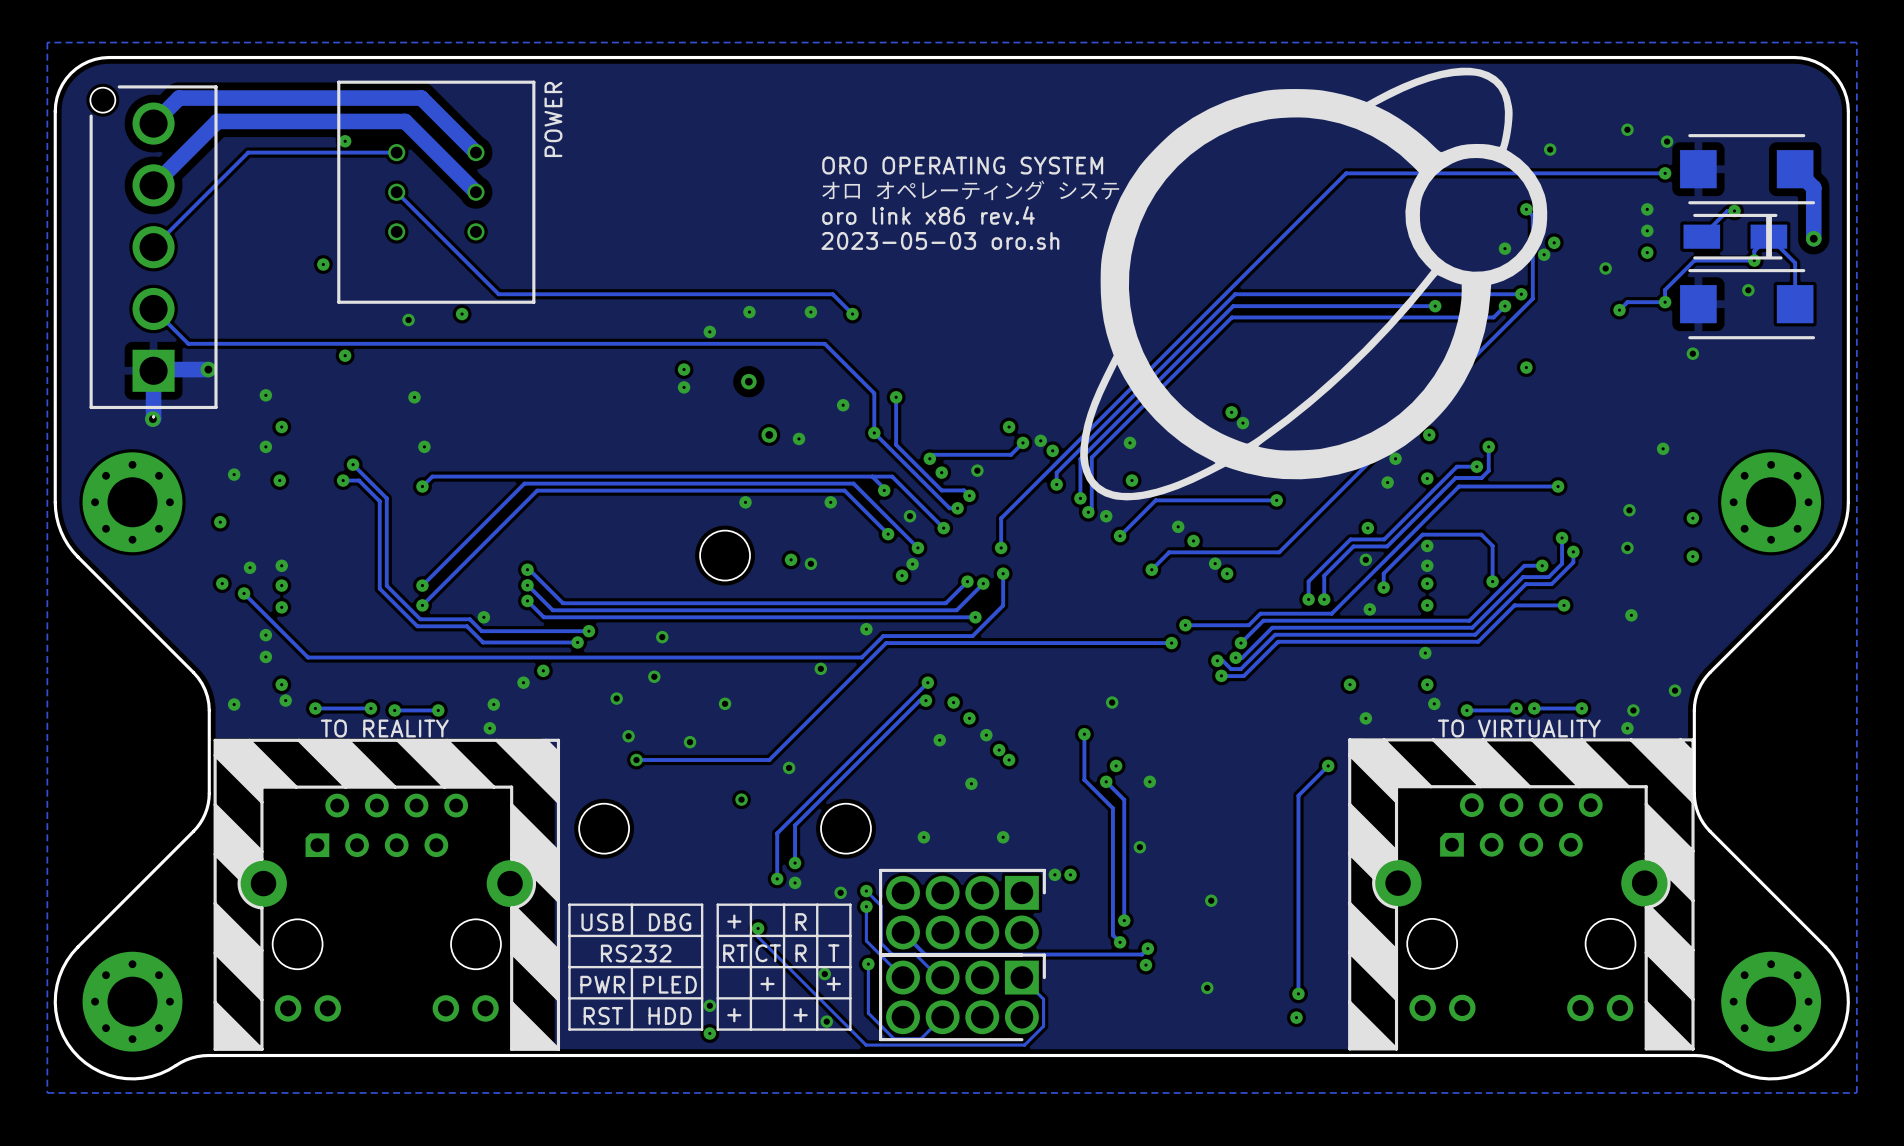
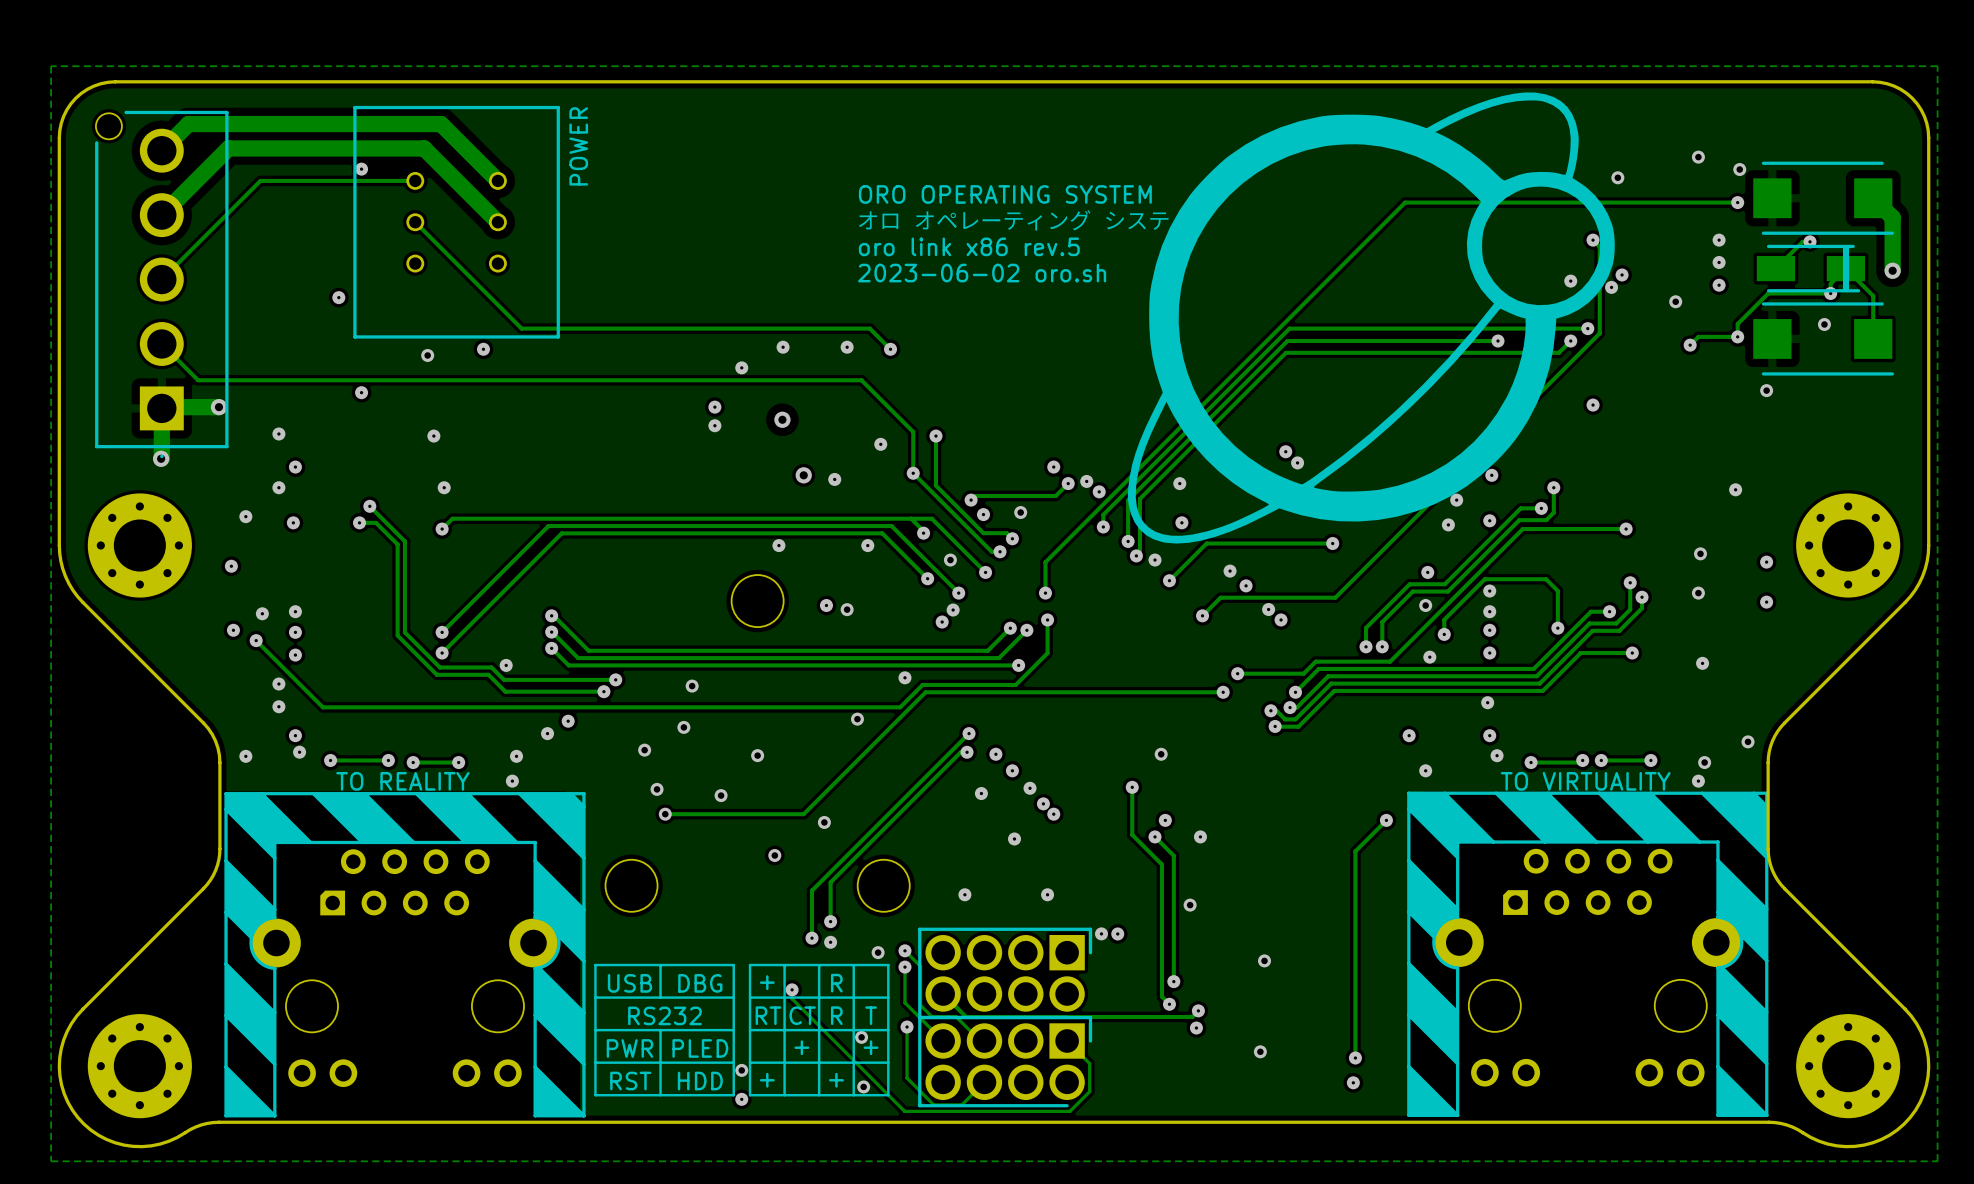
text: oro link x86 rev.4 (928, 215) -> oro link x86 rev.5 (969, 246)
text: 2023-05-03 oro.sh (940, 240) -> 2023-06-02 oro.sh (982, 273)

